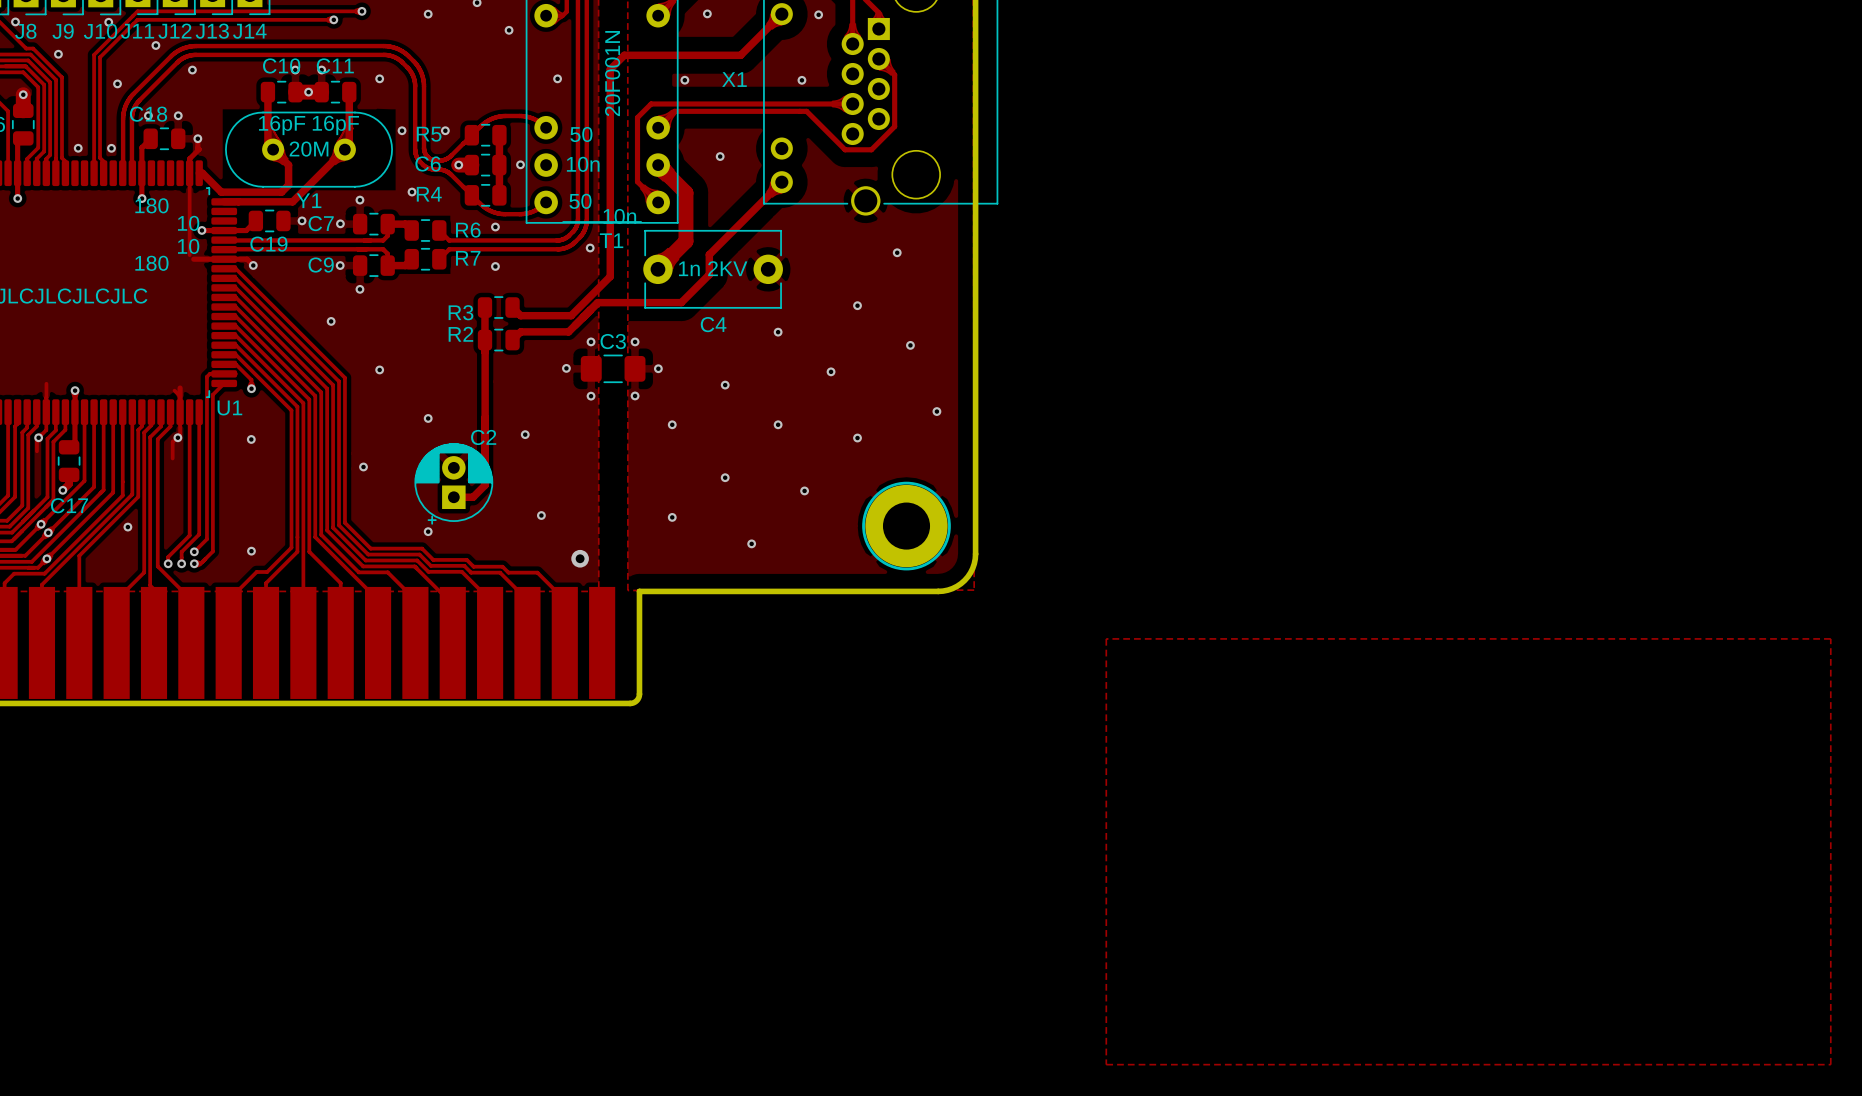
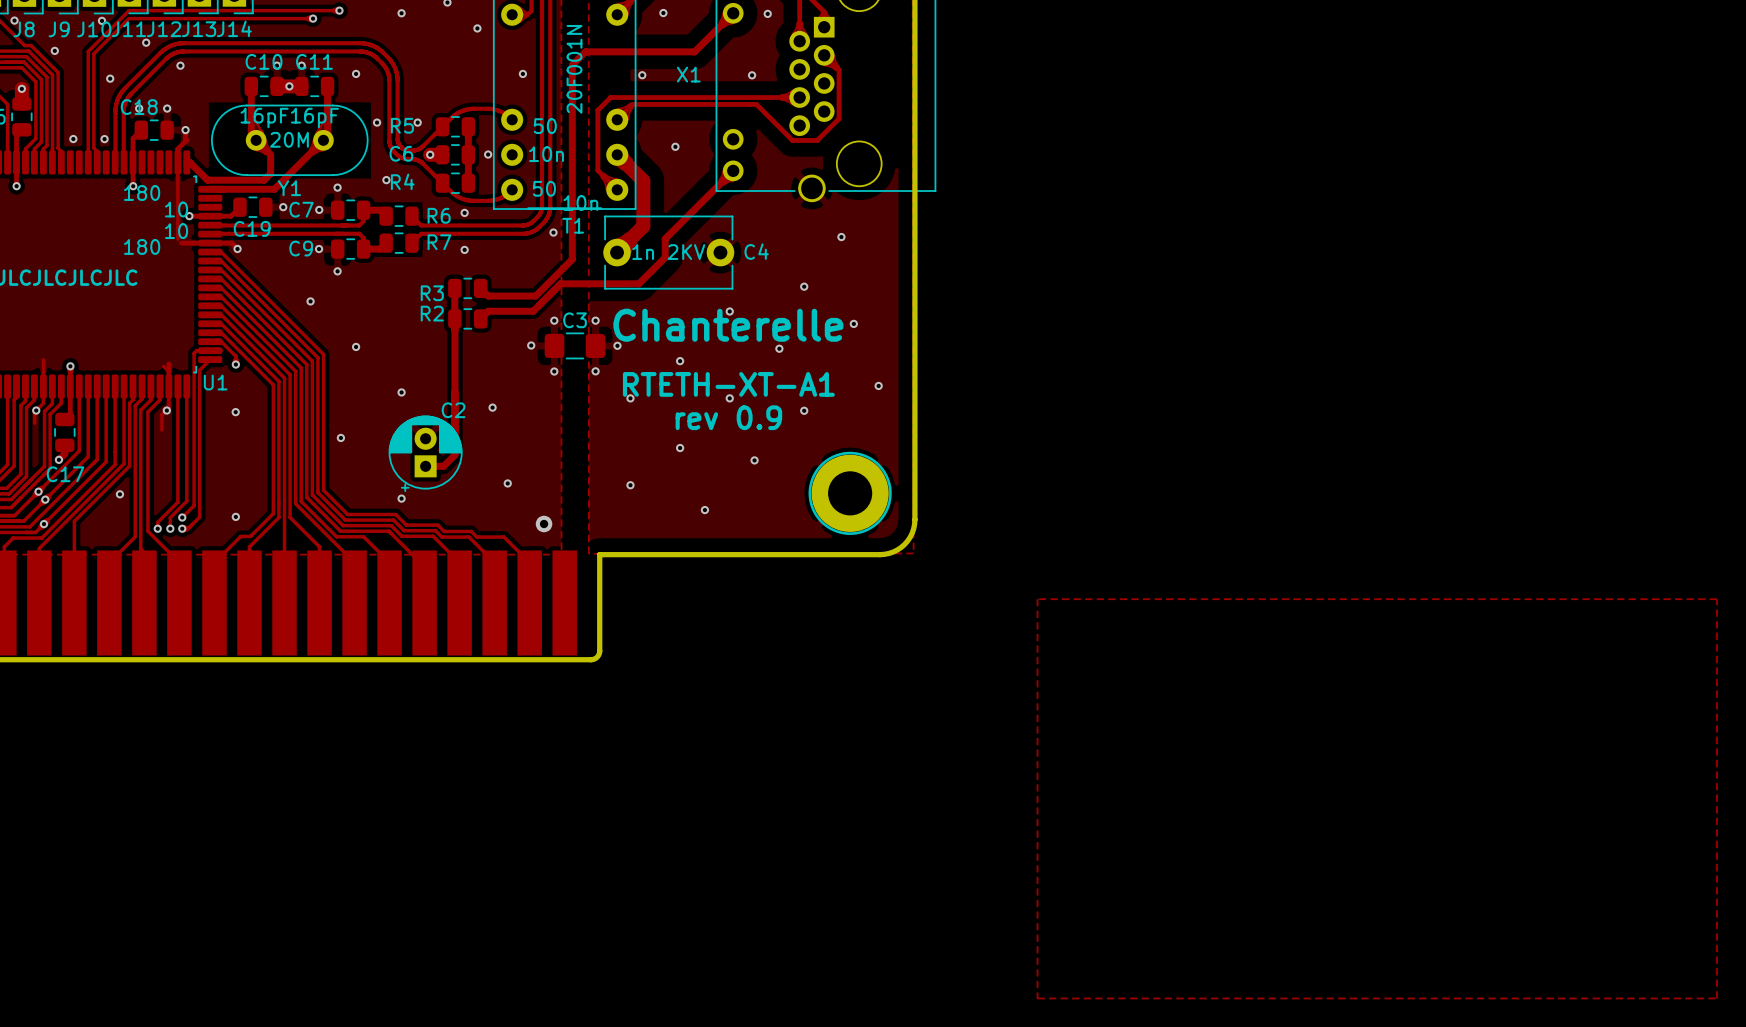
C4 name position: C4 (713, 324) -> C4 (756, 251)
text: none -> Chanterelle (728, 325)
text: none -> RTETH-XT-A1 (728, 384)
text: none -> rev 0.9 (728, 417)

